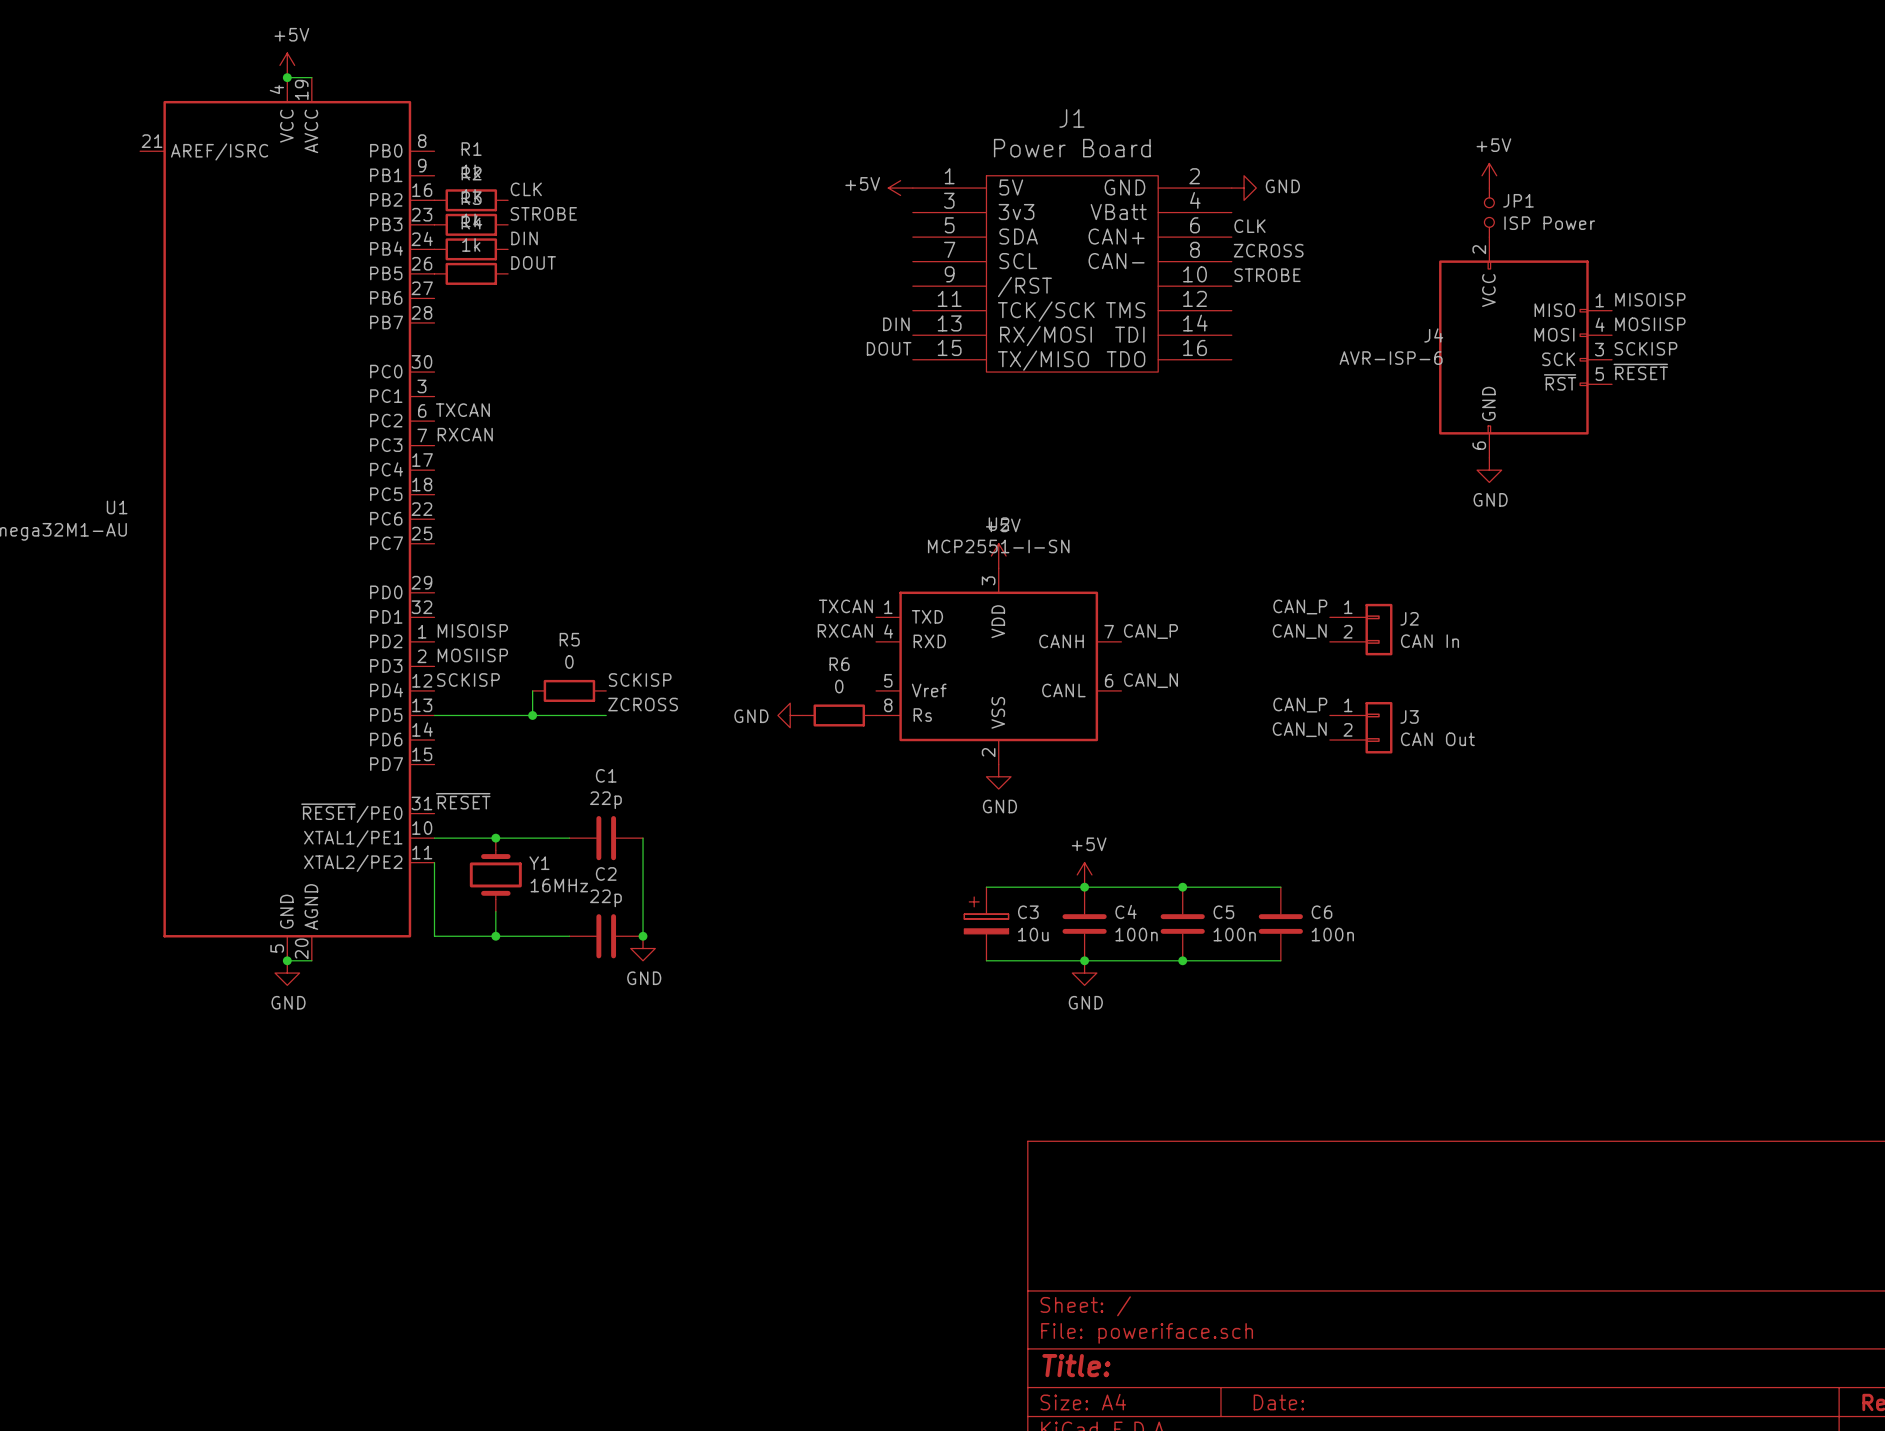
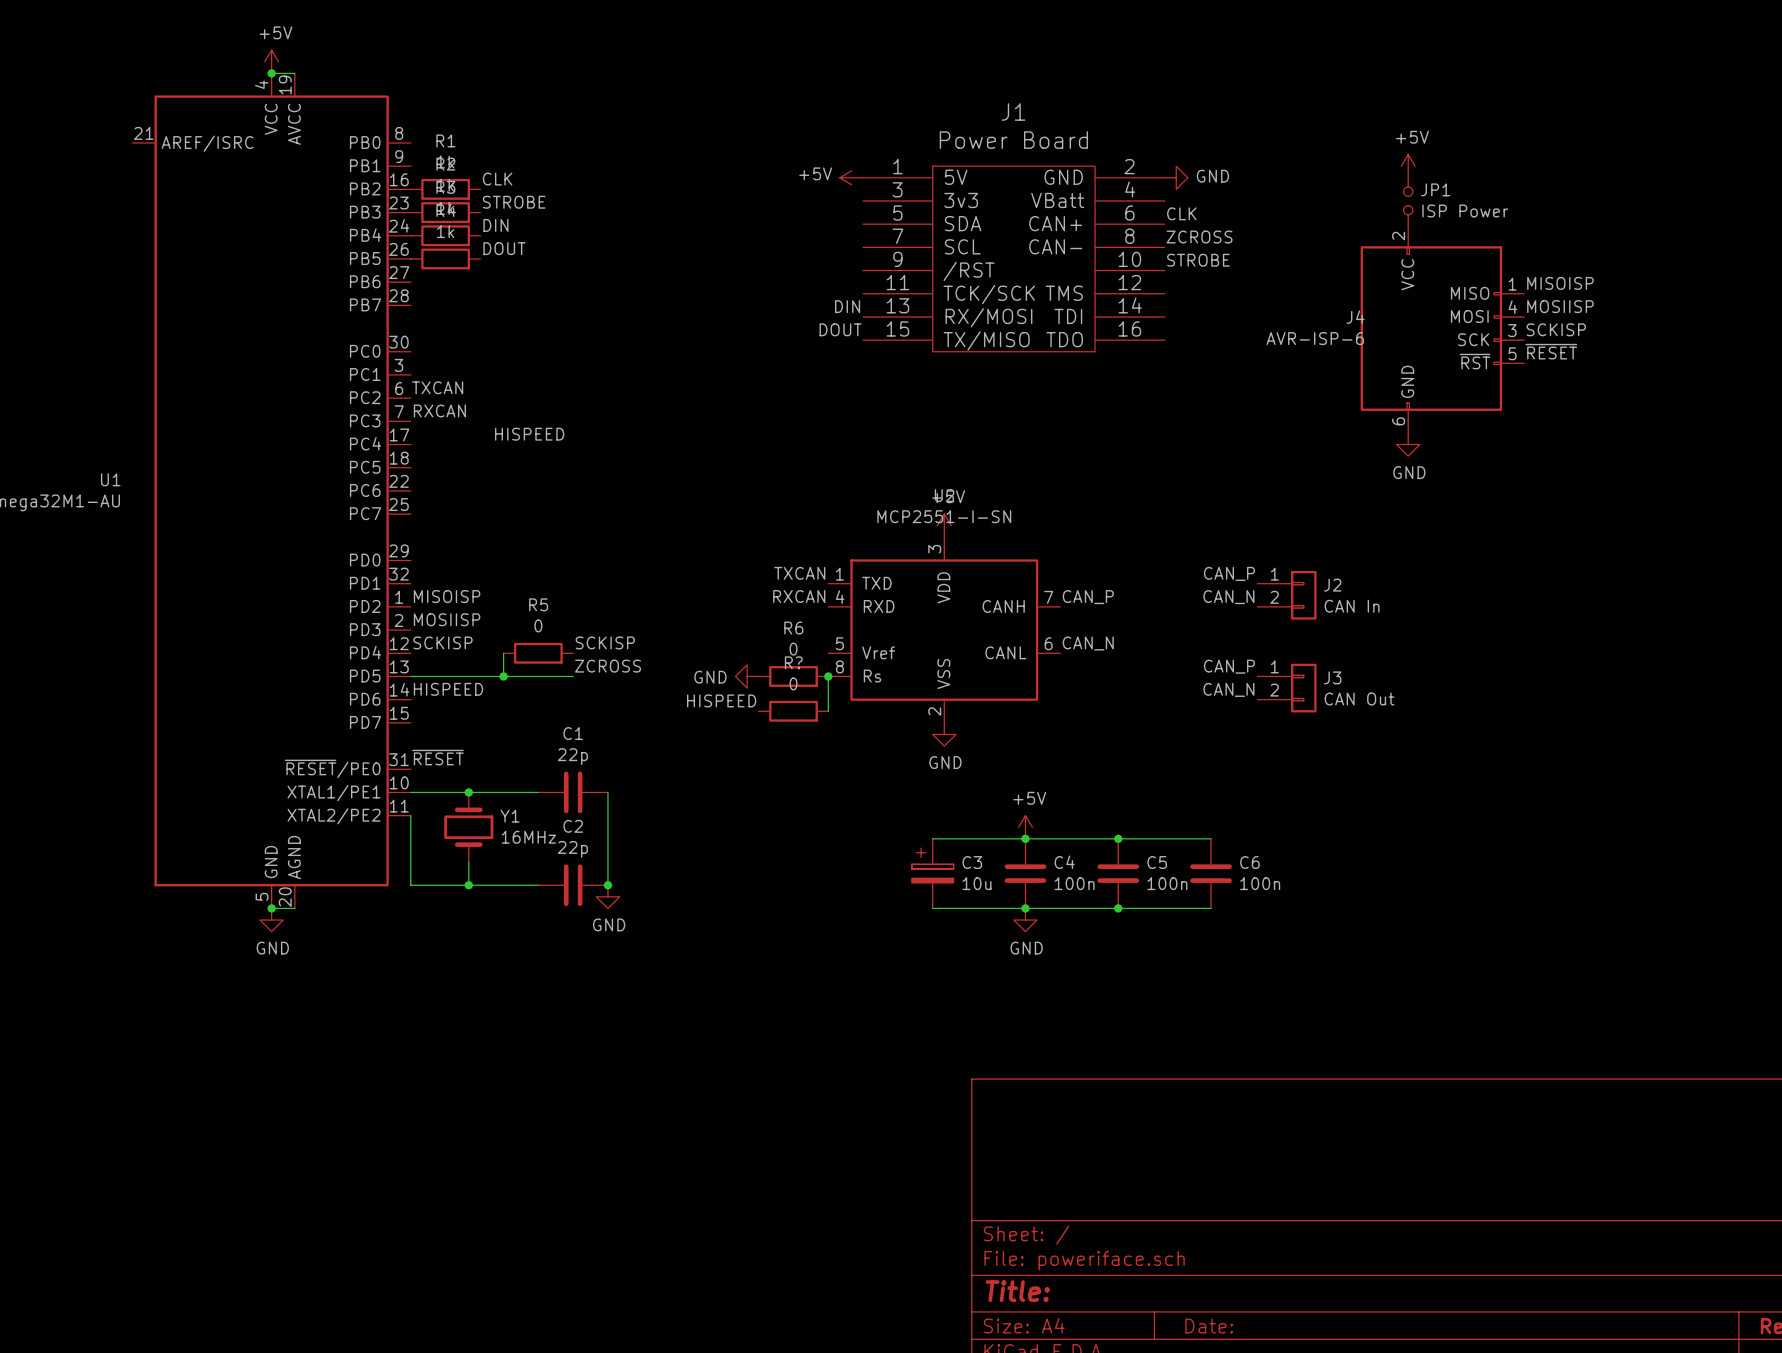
label: none -> HISPEED (529, 434)
wire: none -> (828, 676) (828, 711)
junction: none -> (828, 676)
label: none -> HISPEED (448, 689)
label: none -> HISPEED (721, 700)
R?: none -> 0 (793, 711)

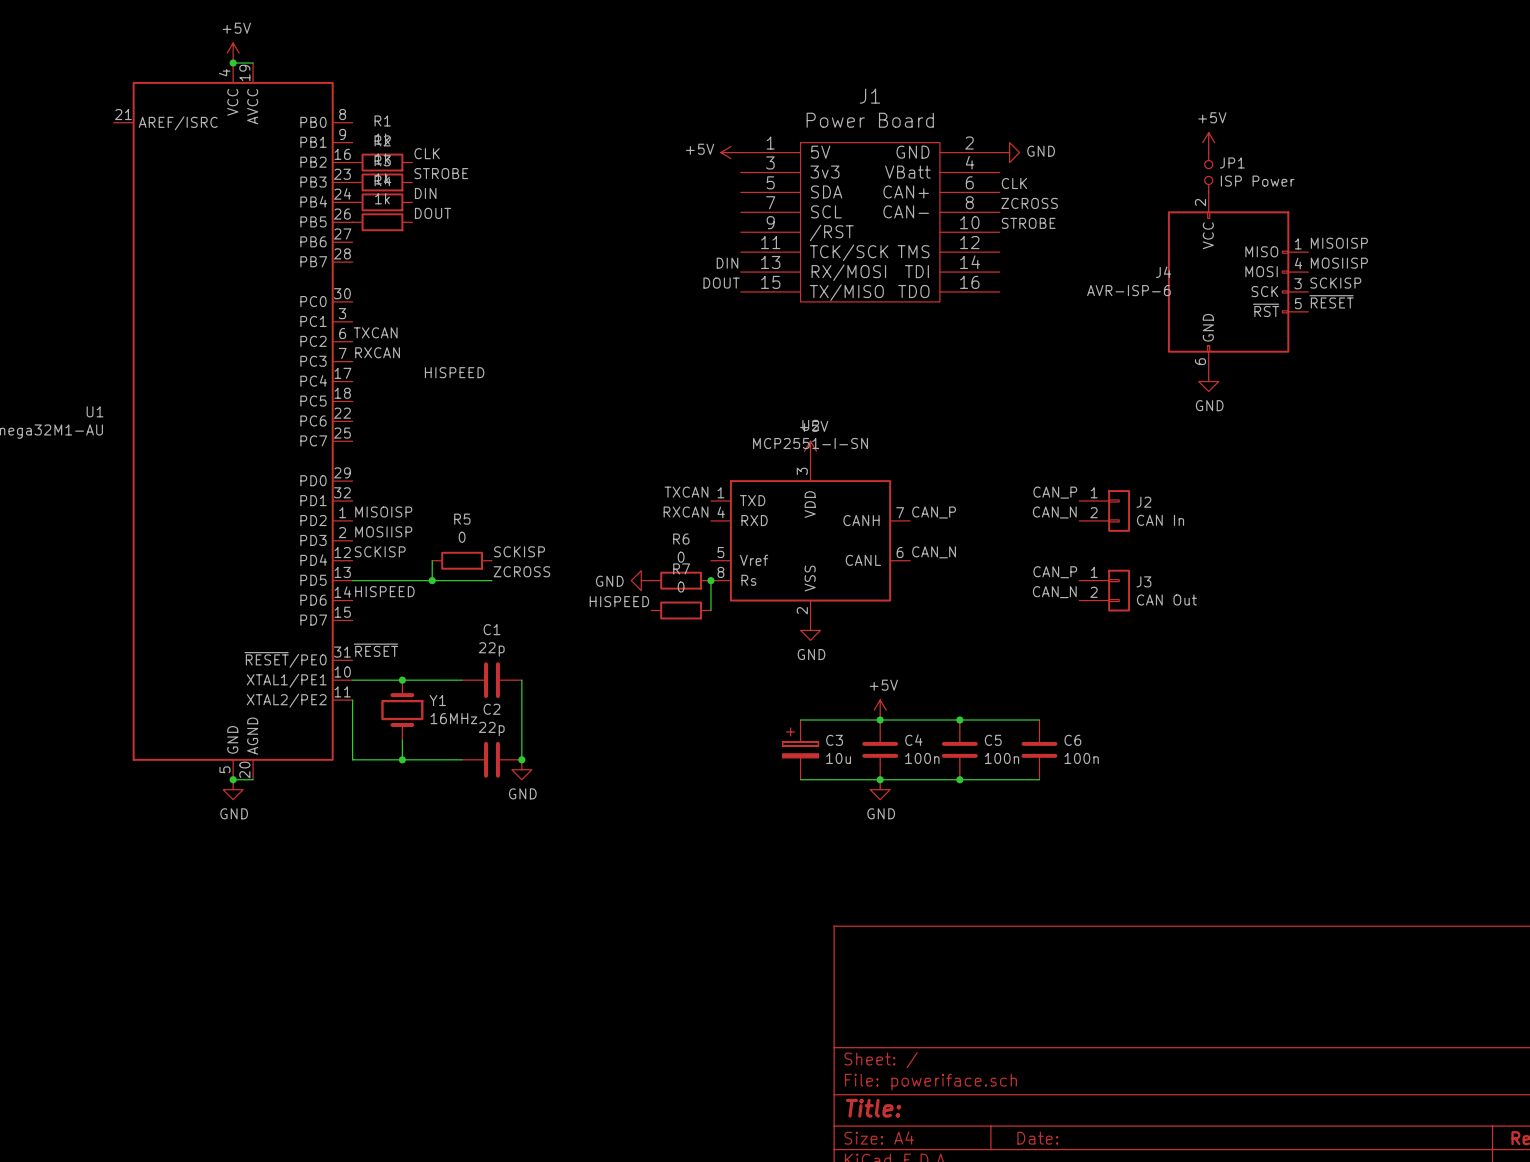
R? name: R? (793, 662) -> R7 (681, 568)

